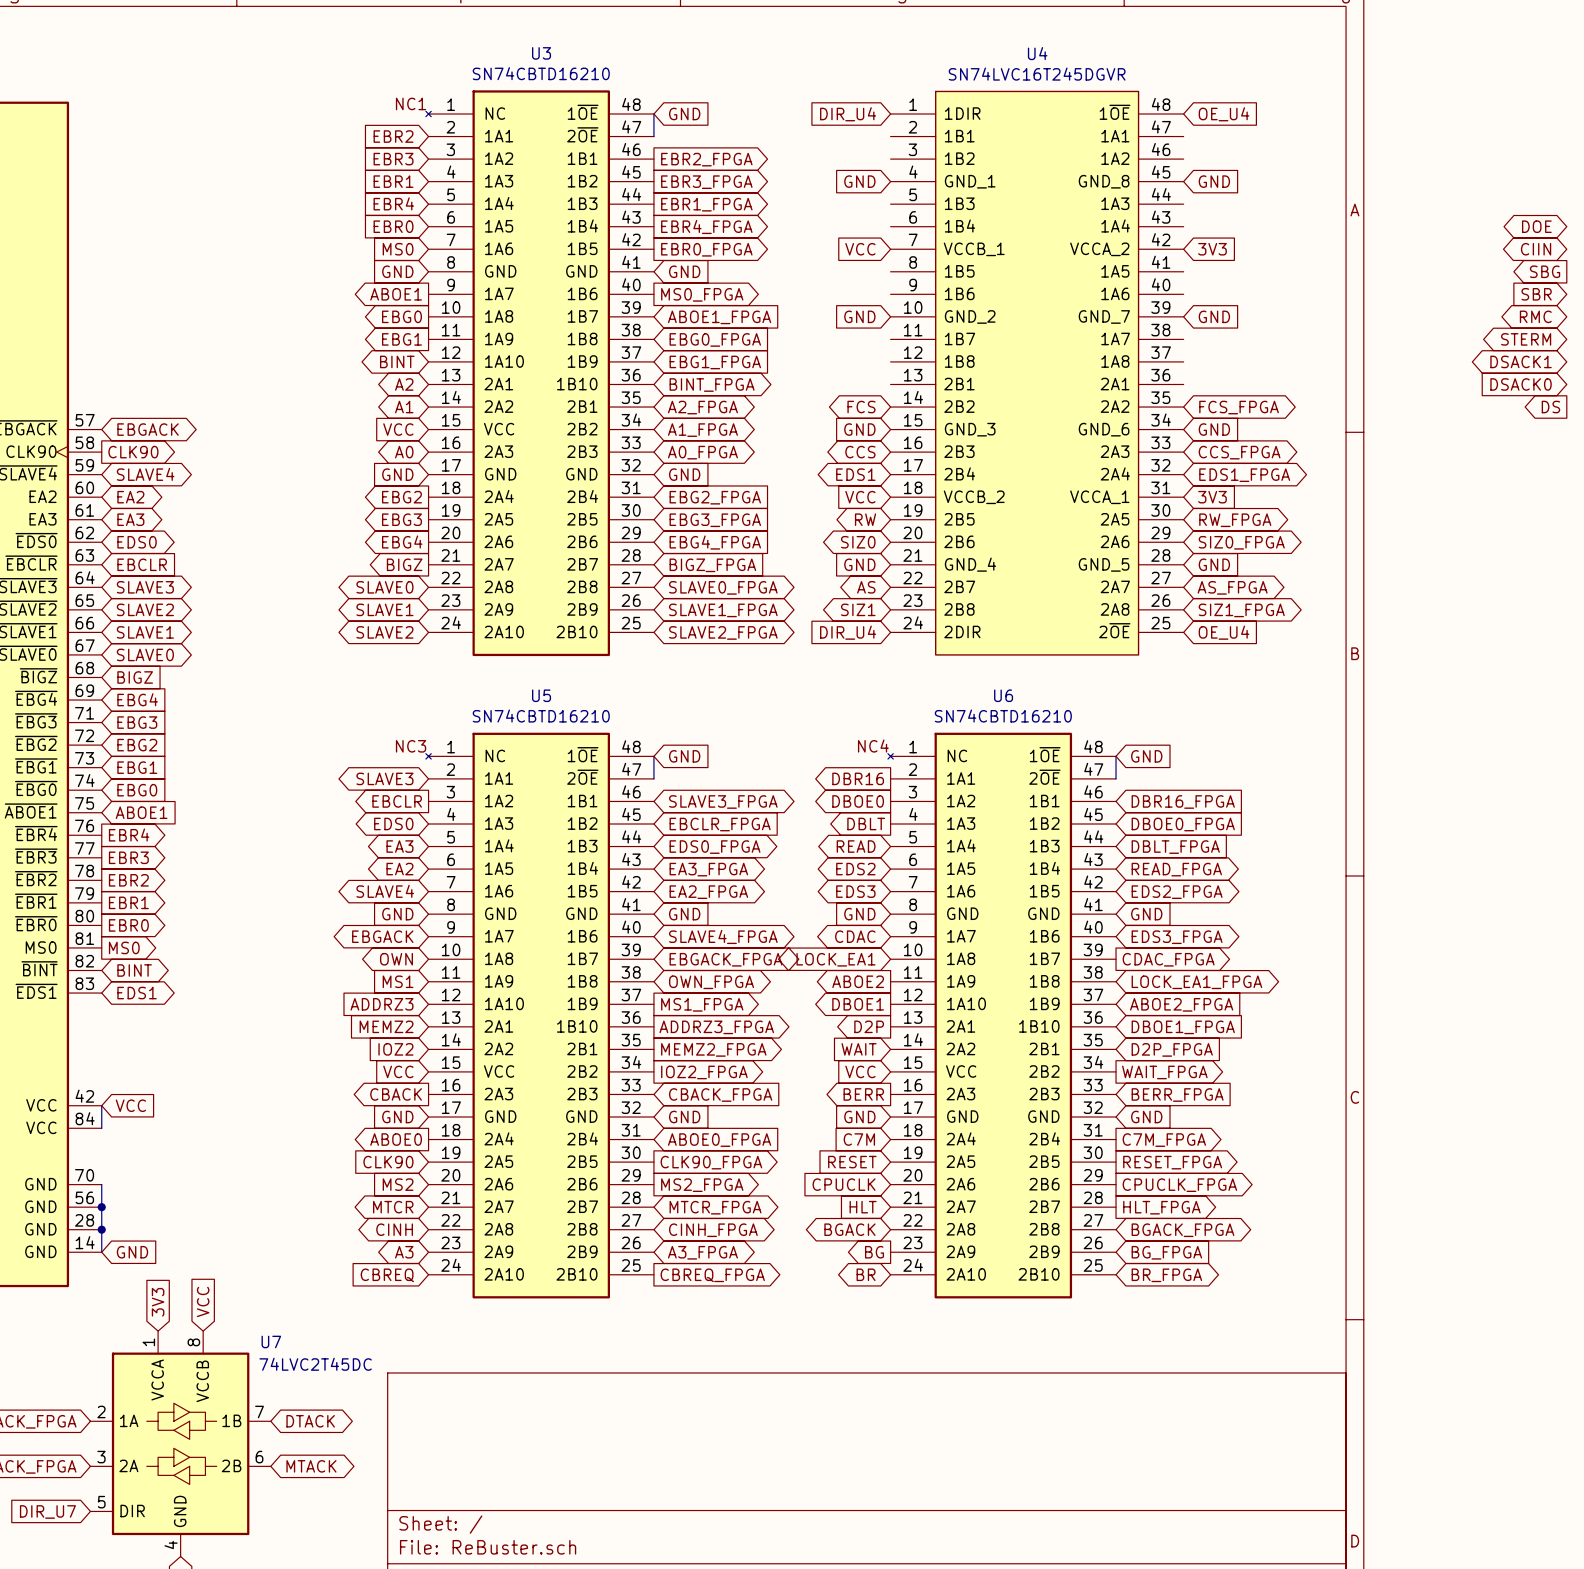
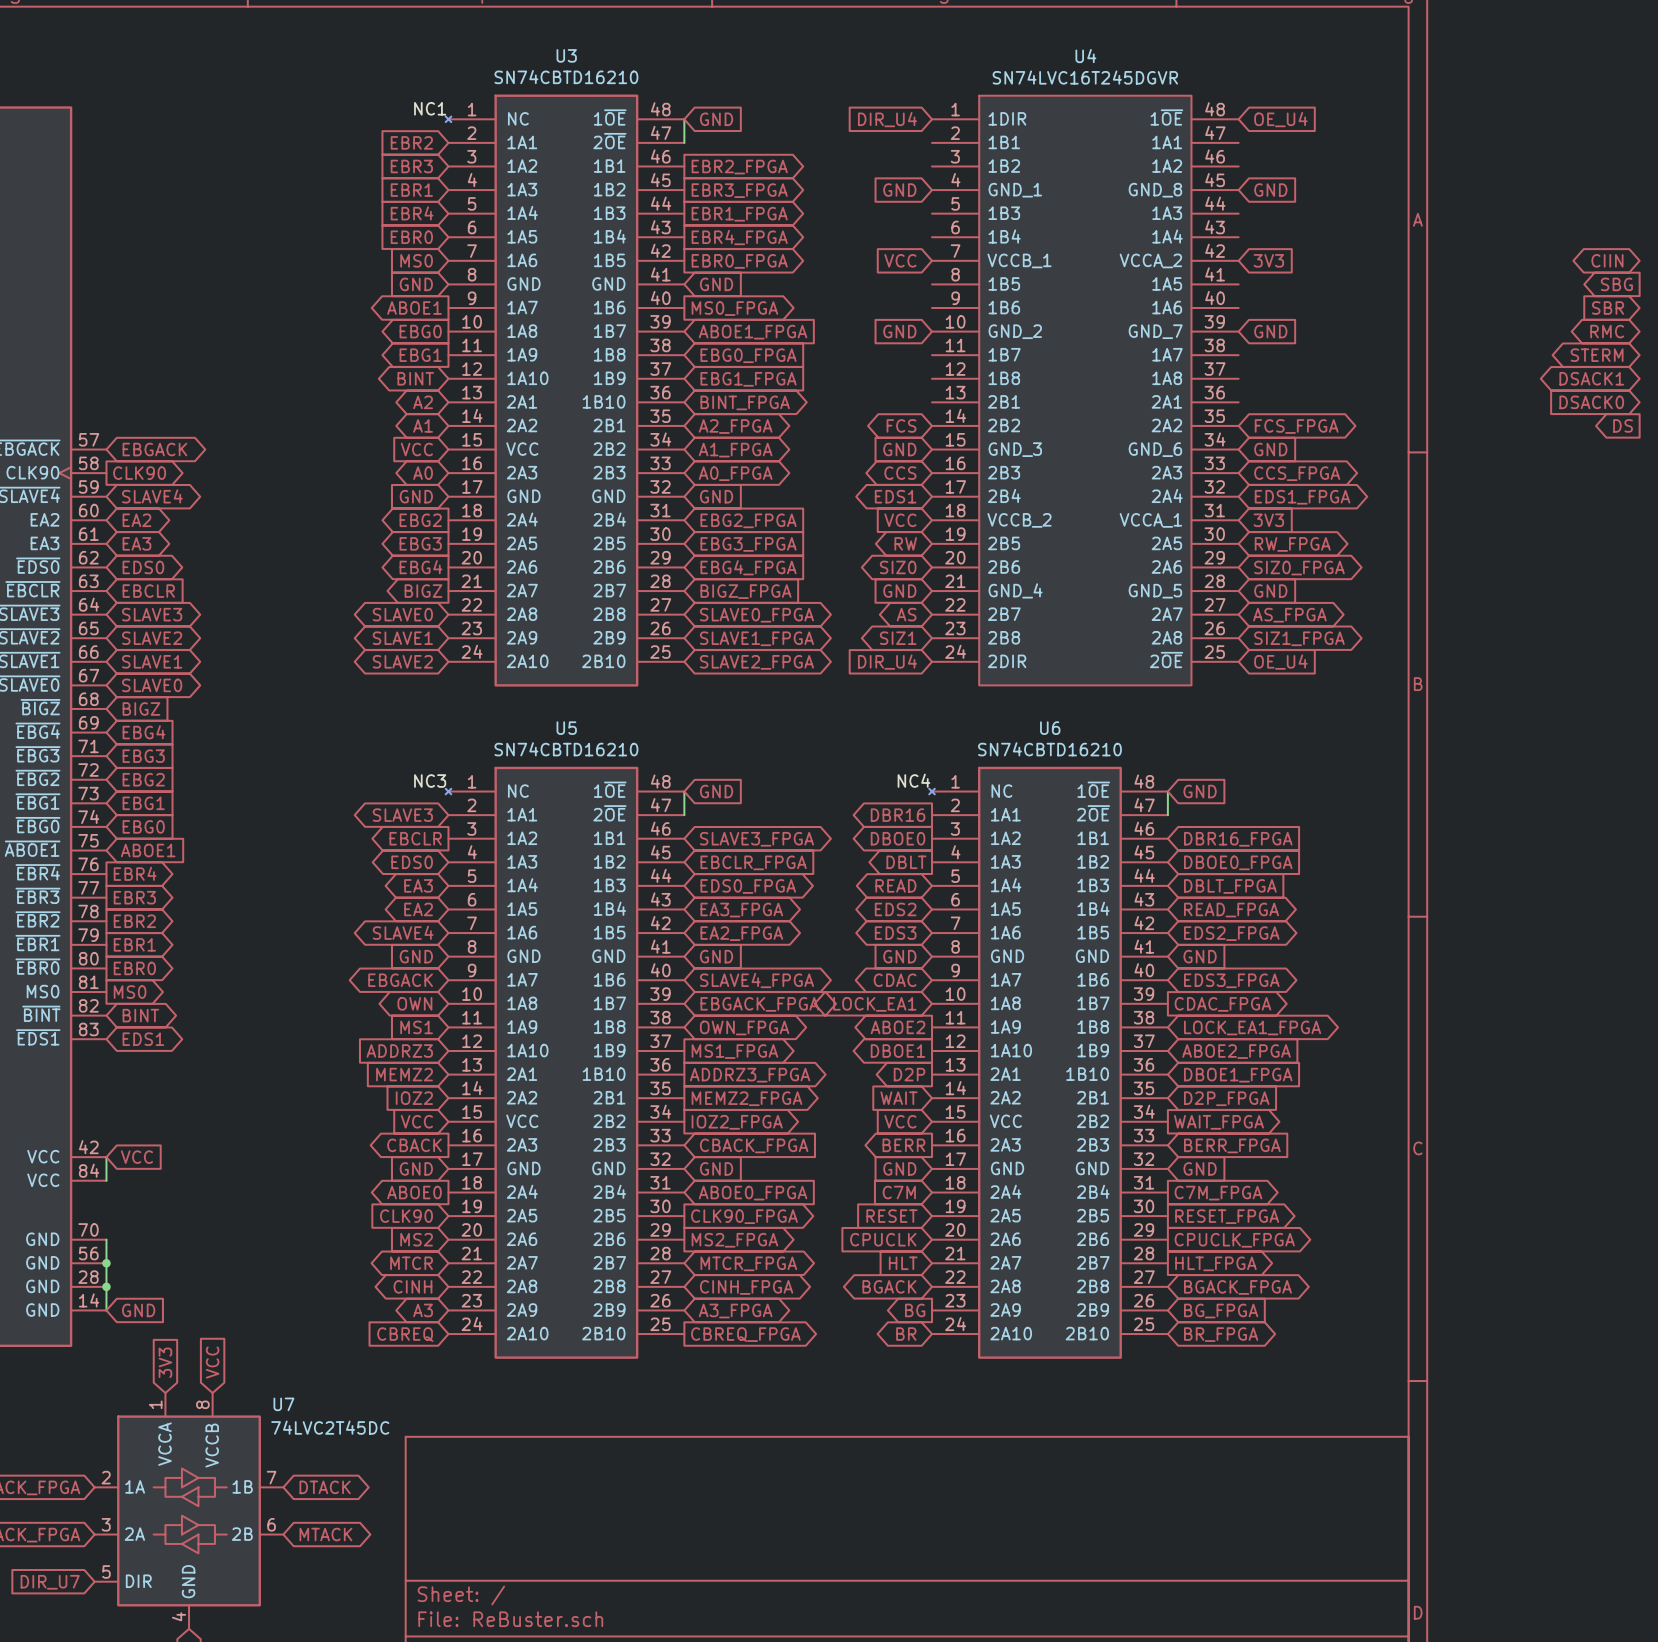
global label: DOE (1536, 226) -> none

